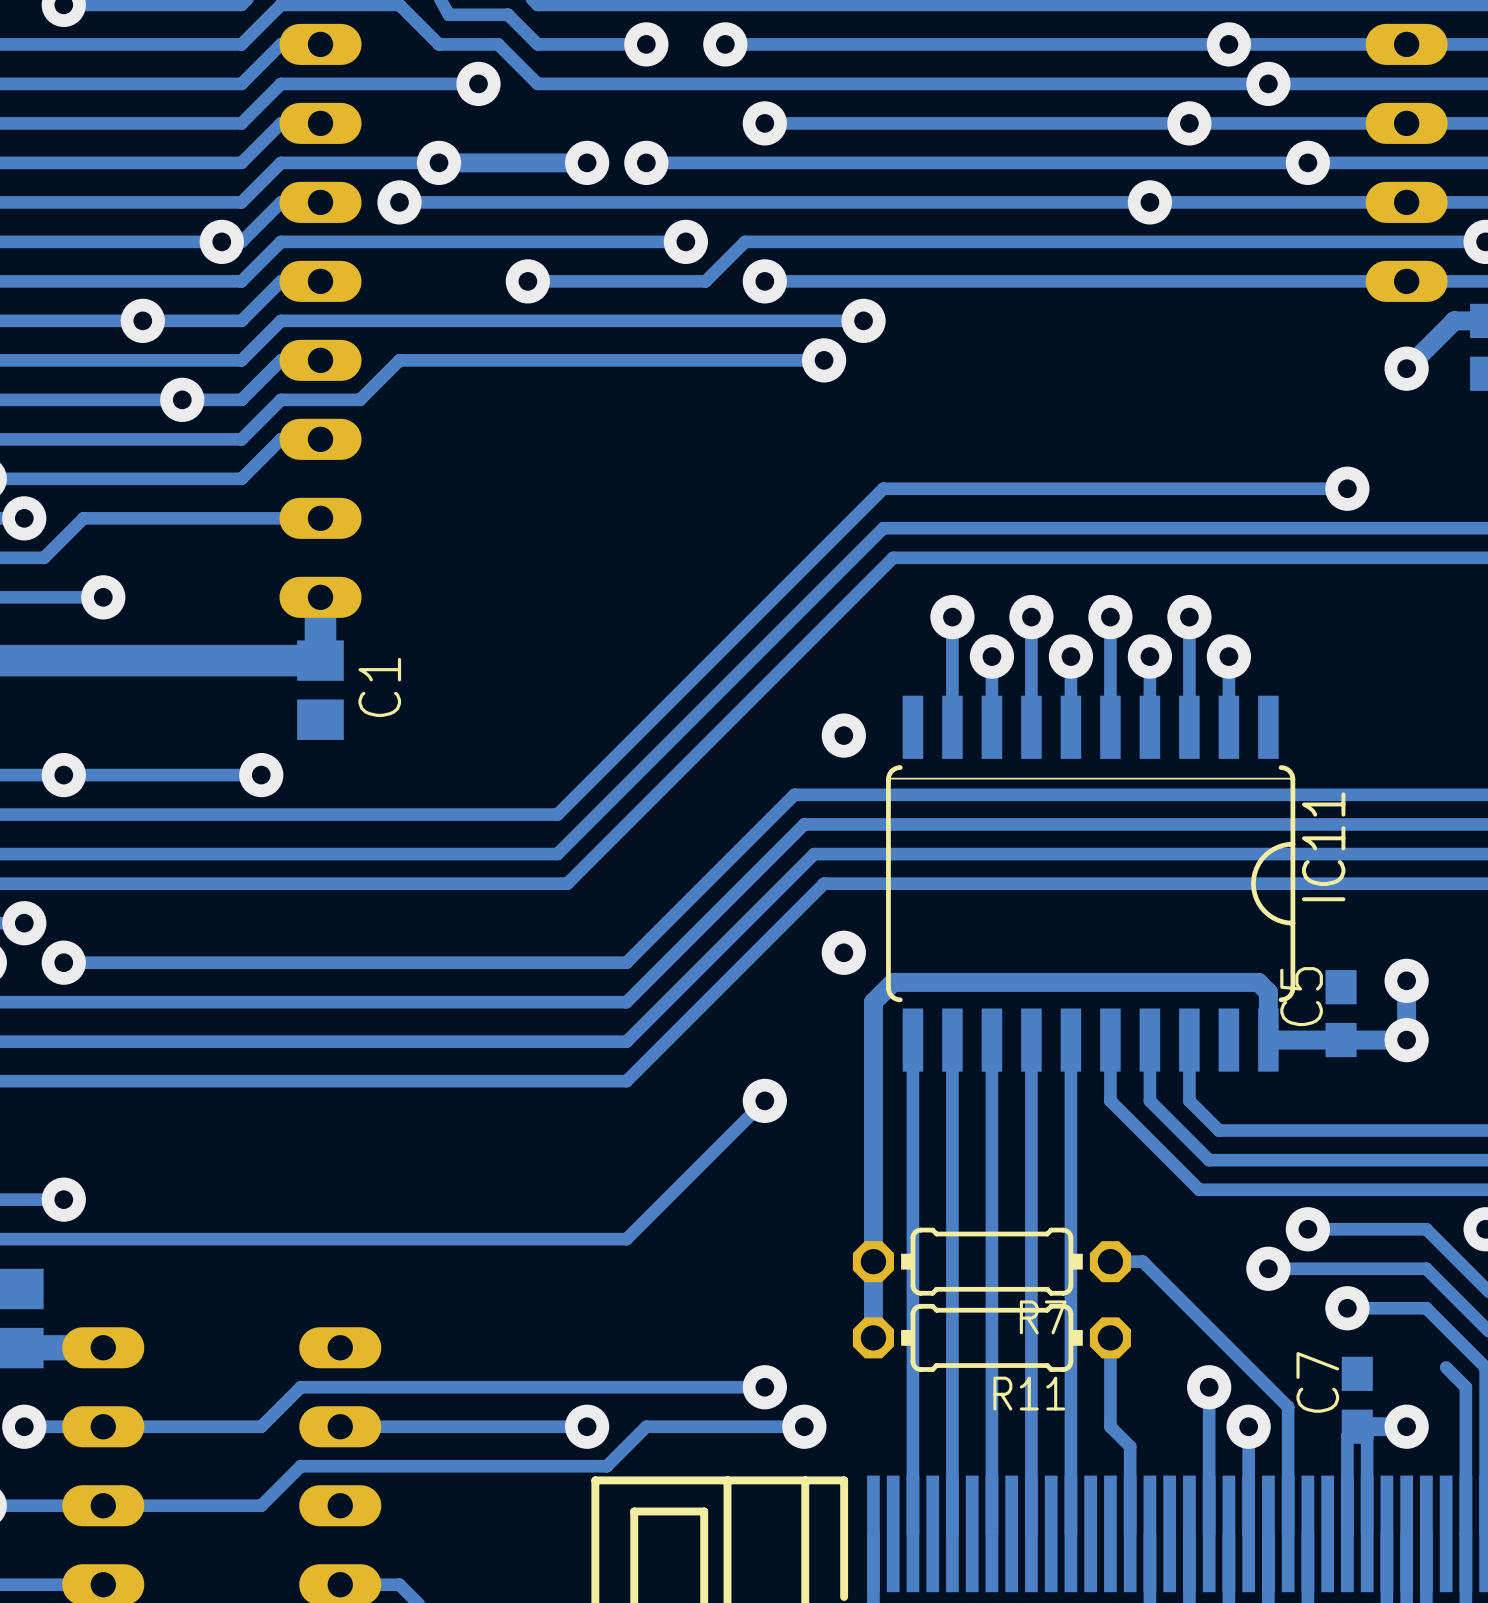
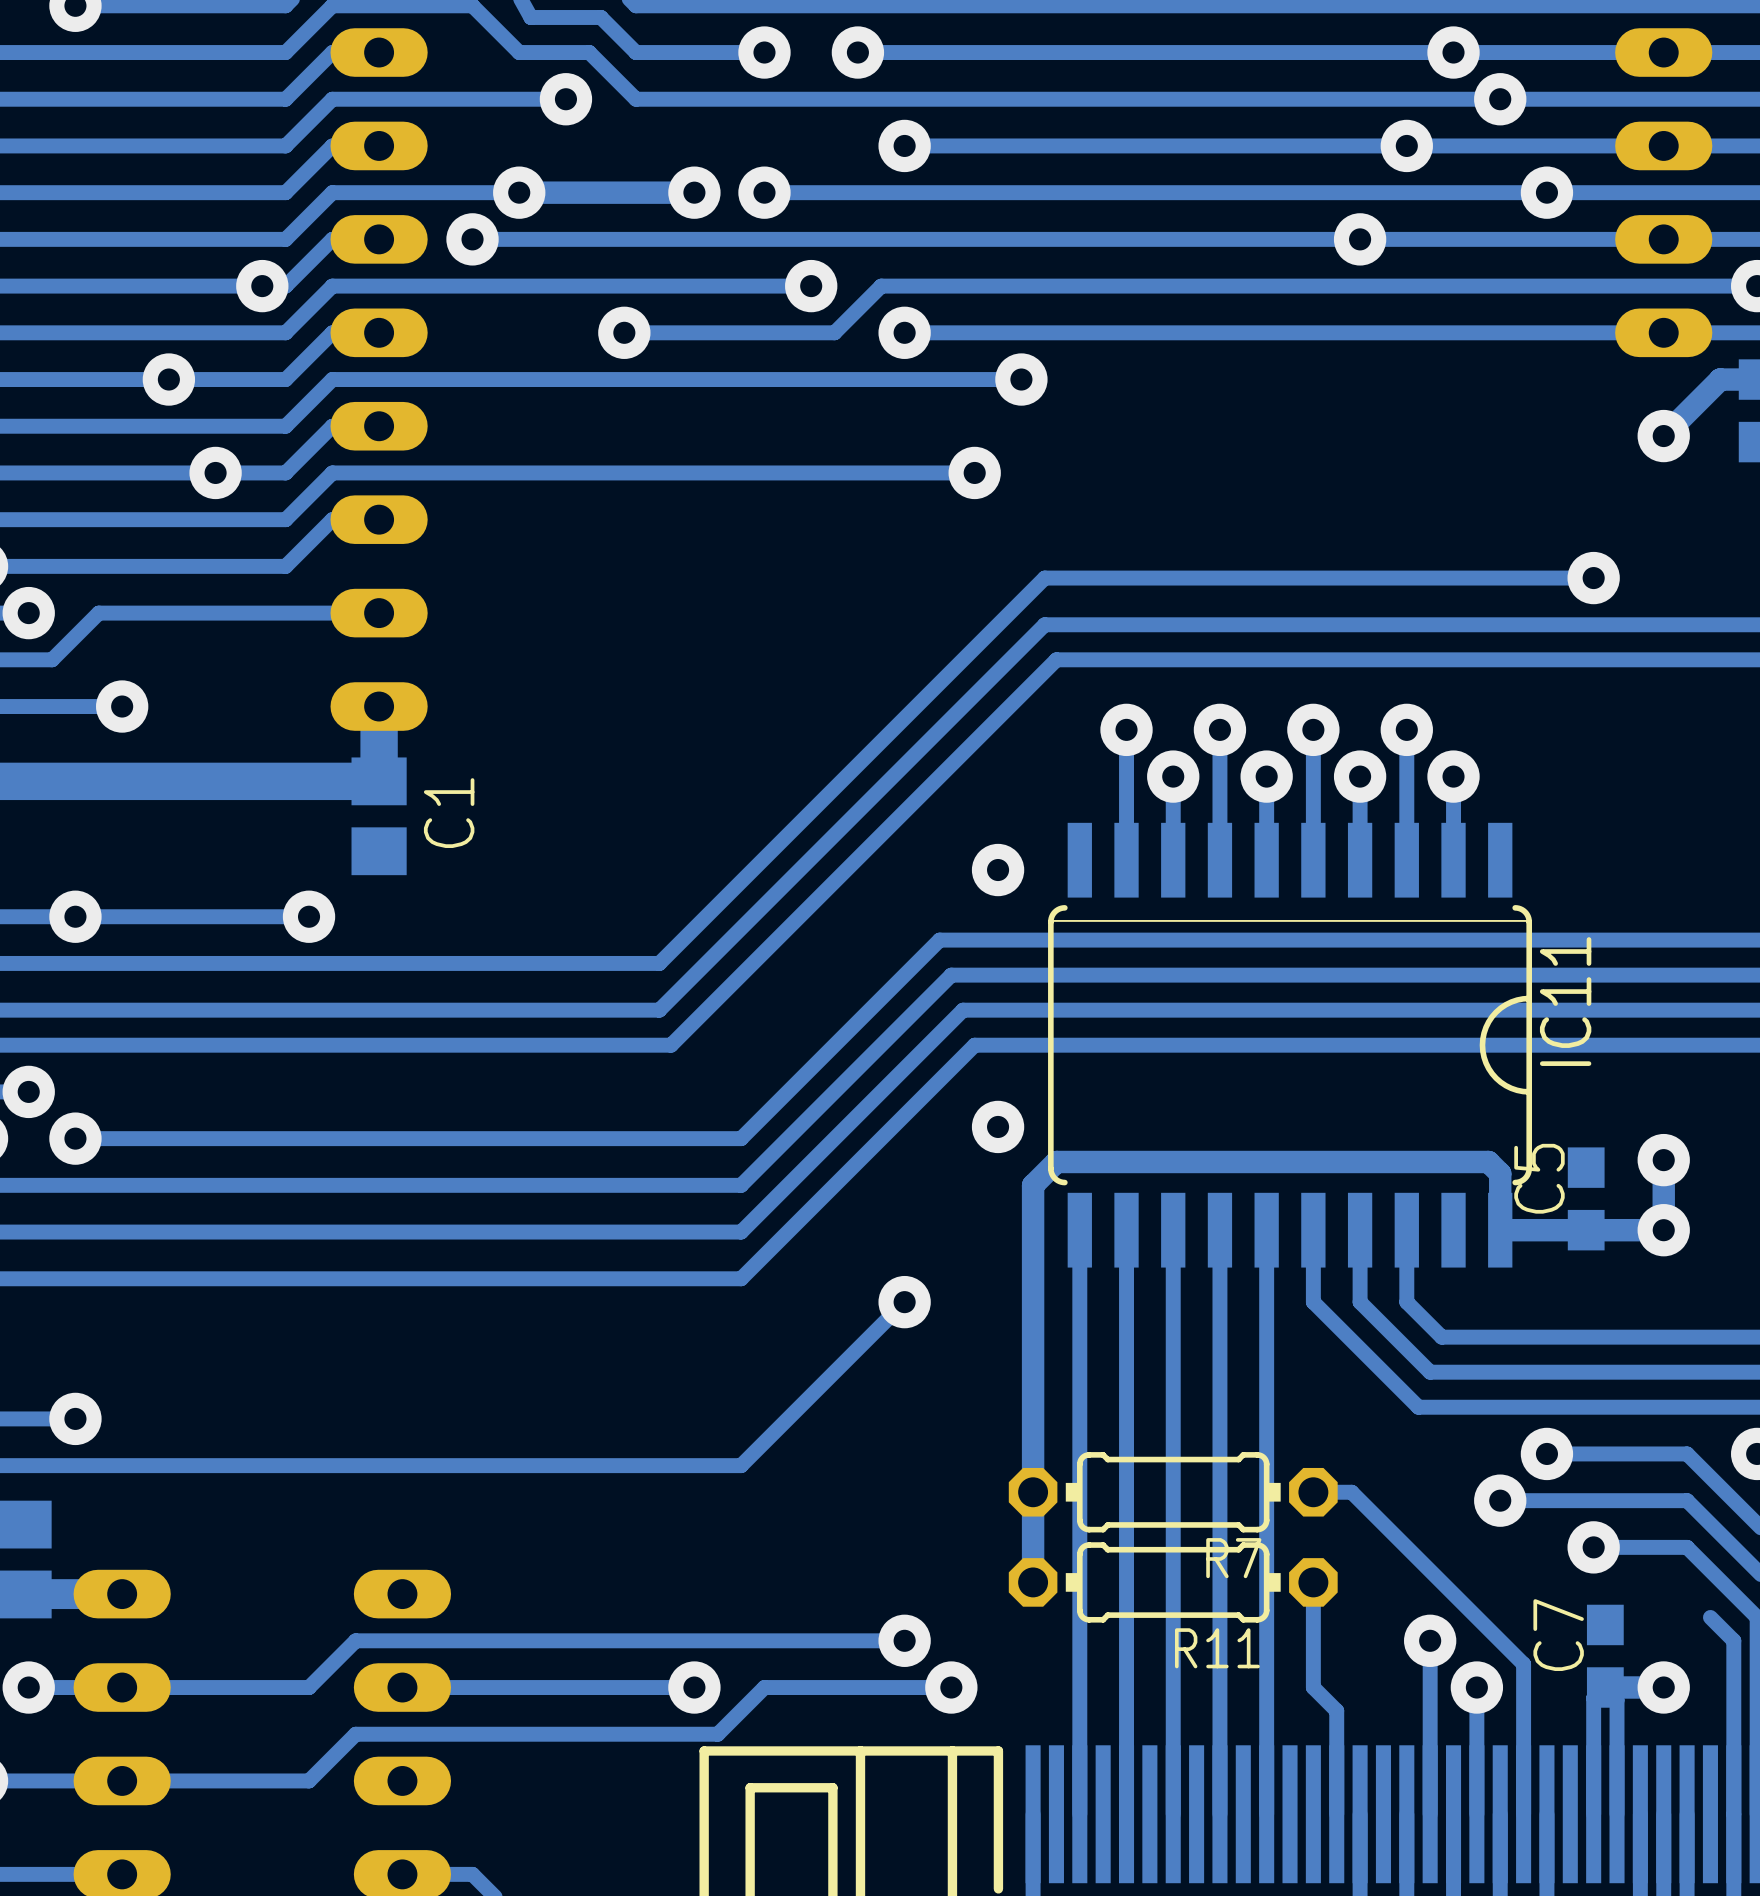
track: (824, 360) (399, 360) (360, 399) -> (974, 472) (425, 472)
via position: (824, 360) -> (974, 472)

